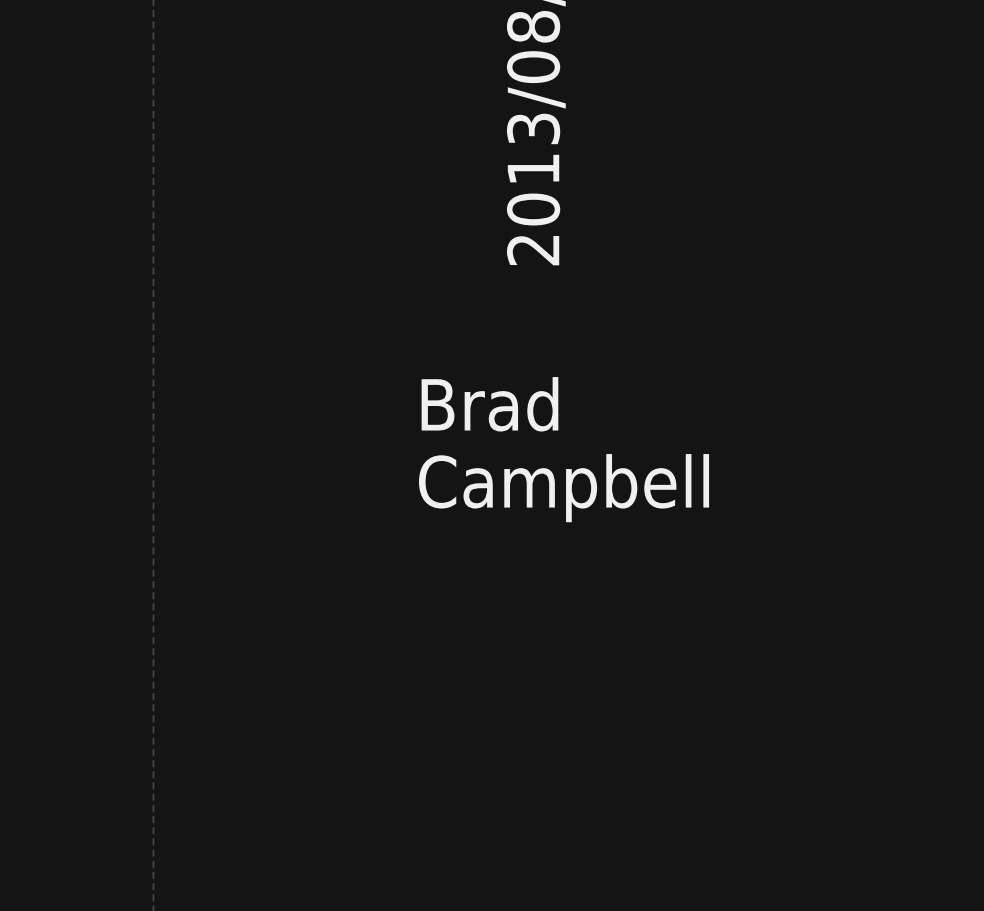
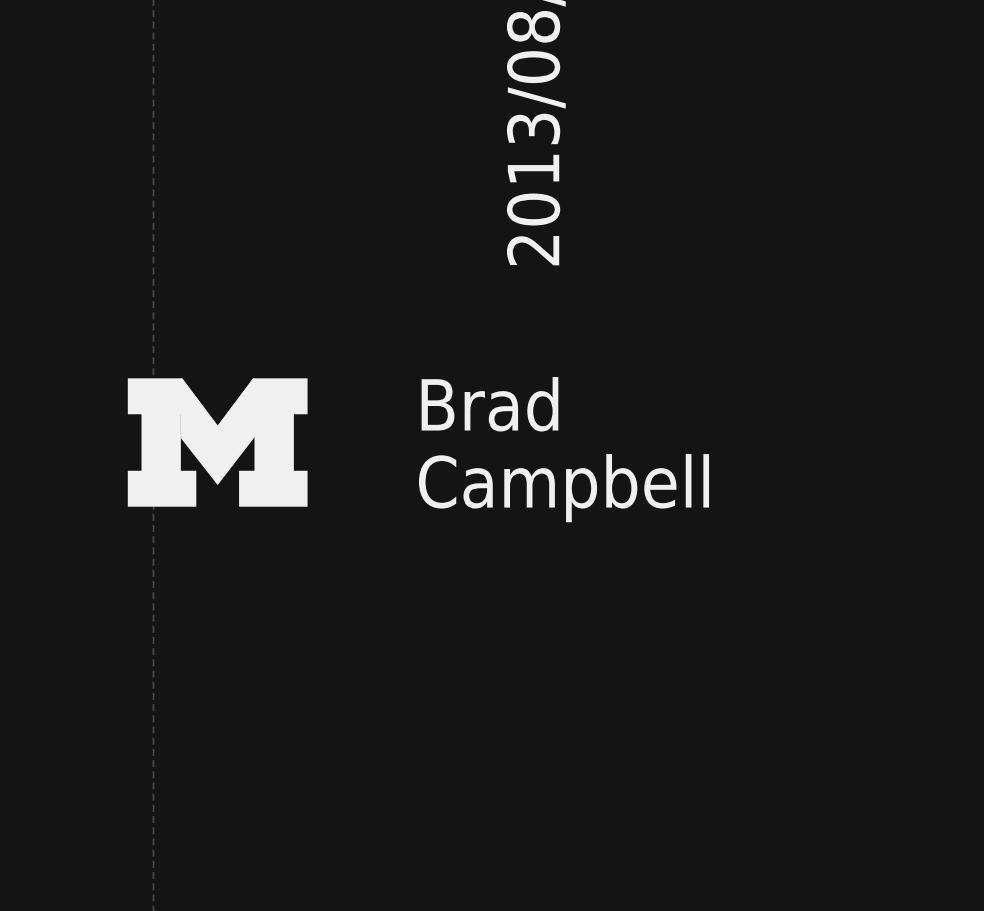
drawing: none -> [127, 378, 308, 507]

